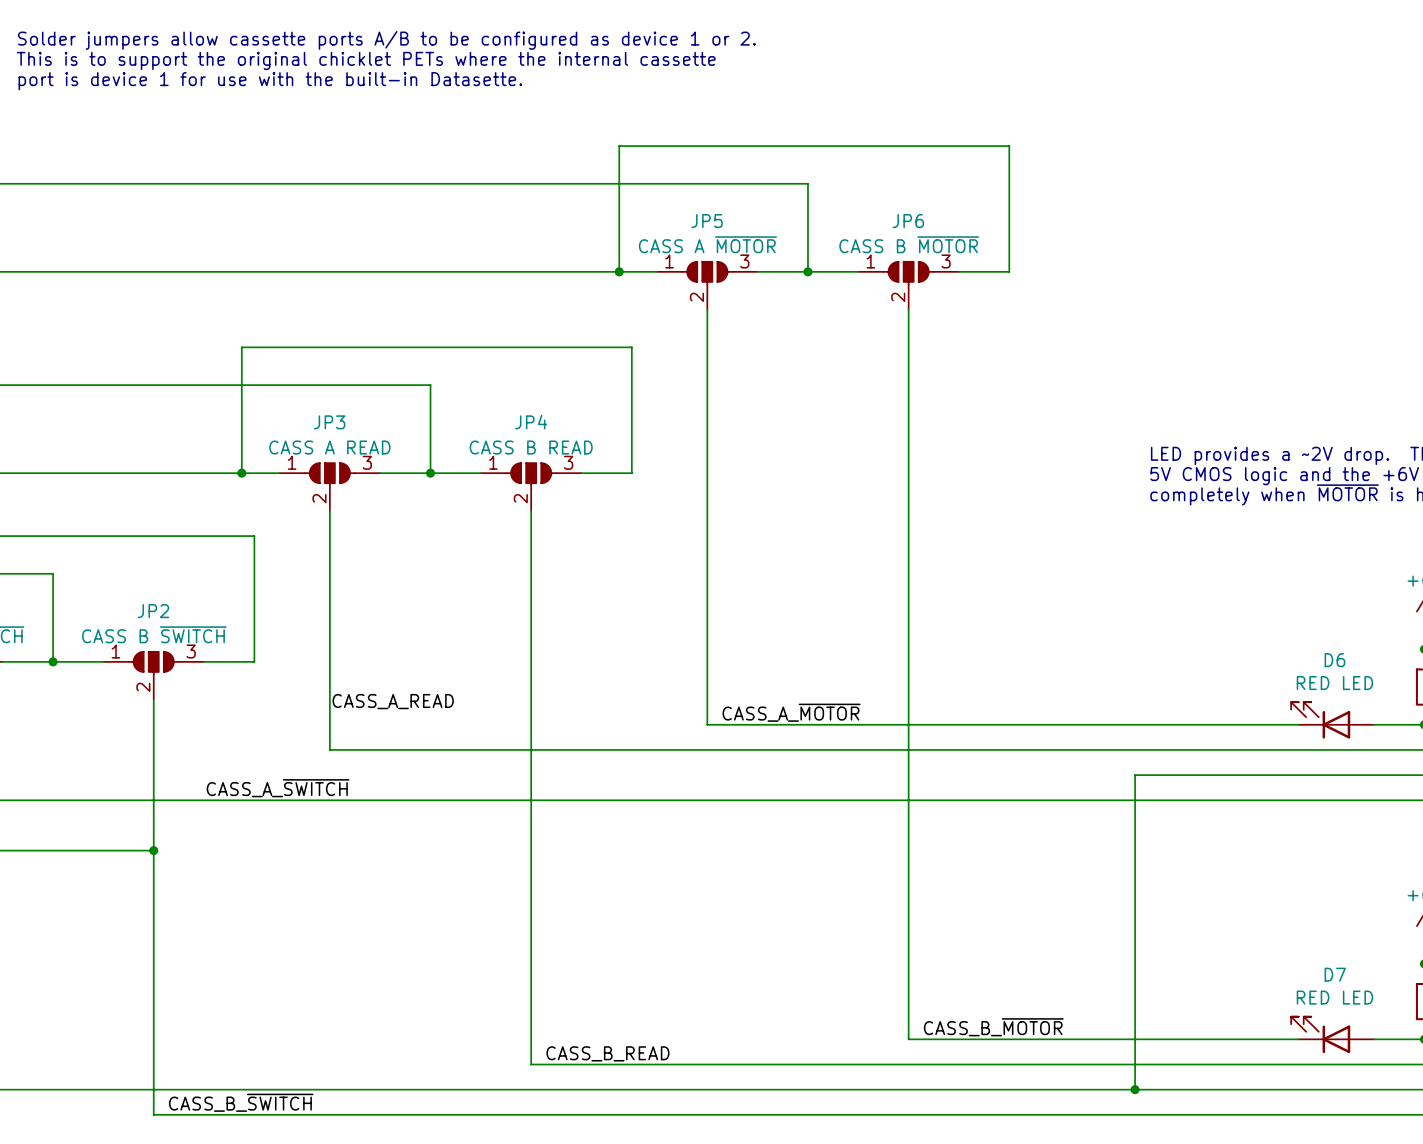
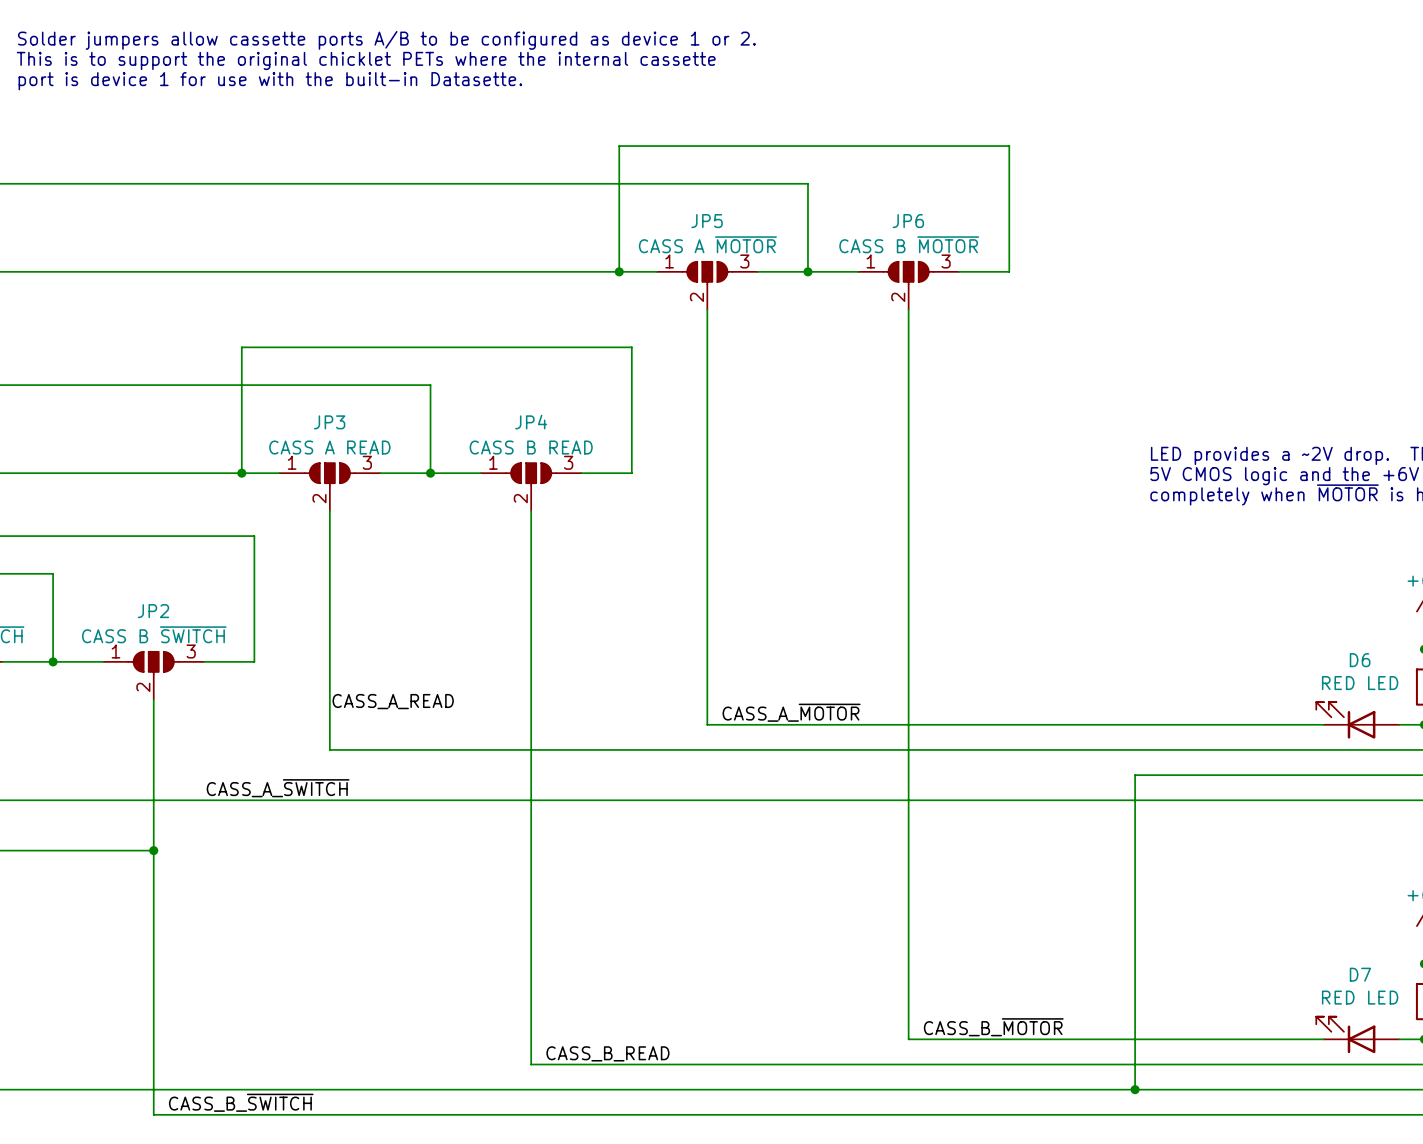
D6 position: (1332, 720) -> (1357, 720)
D7 position: (1332, 1034) -> (1357, 1034)

